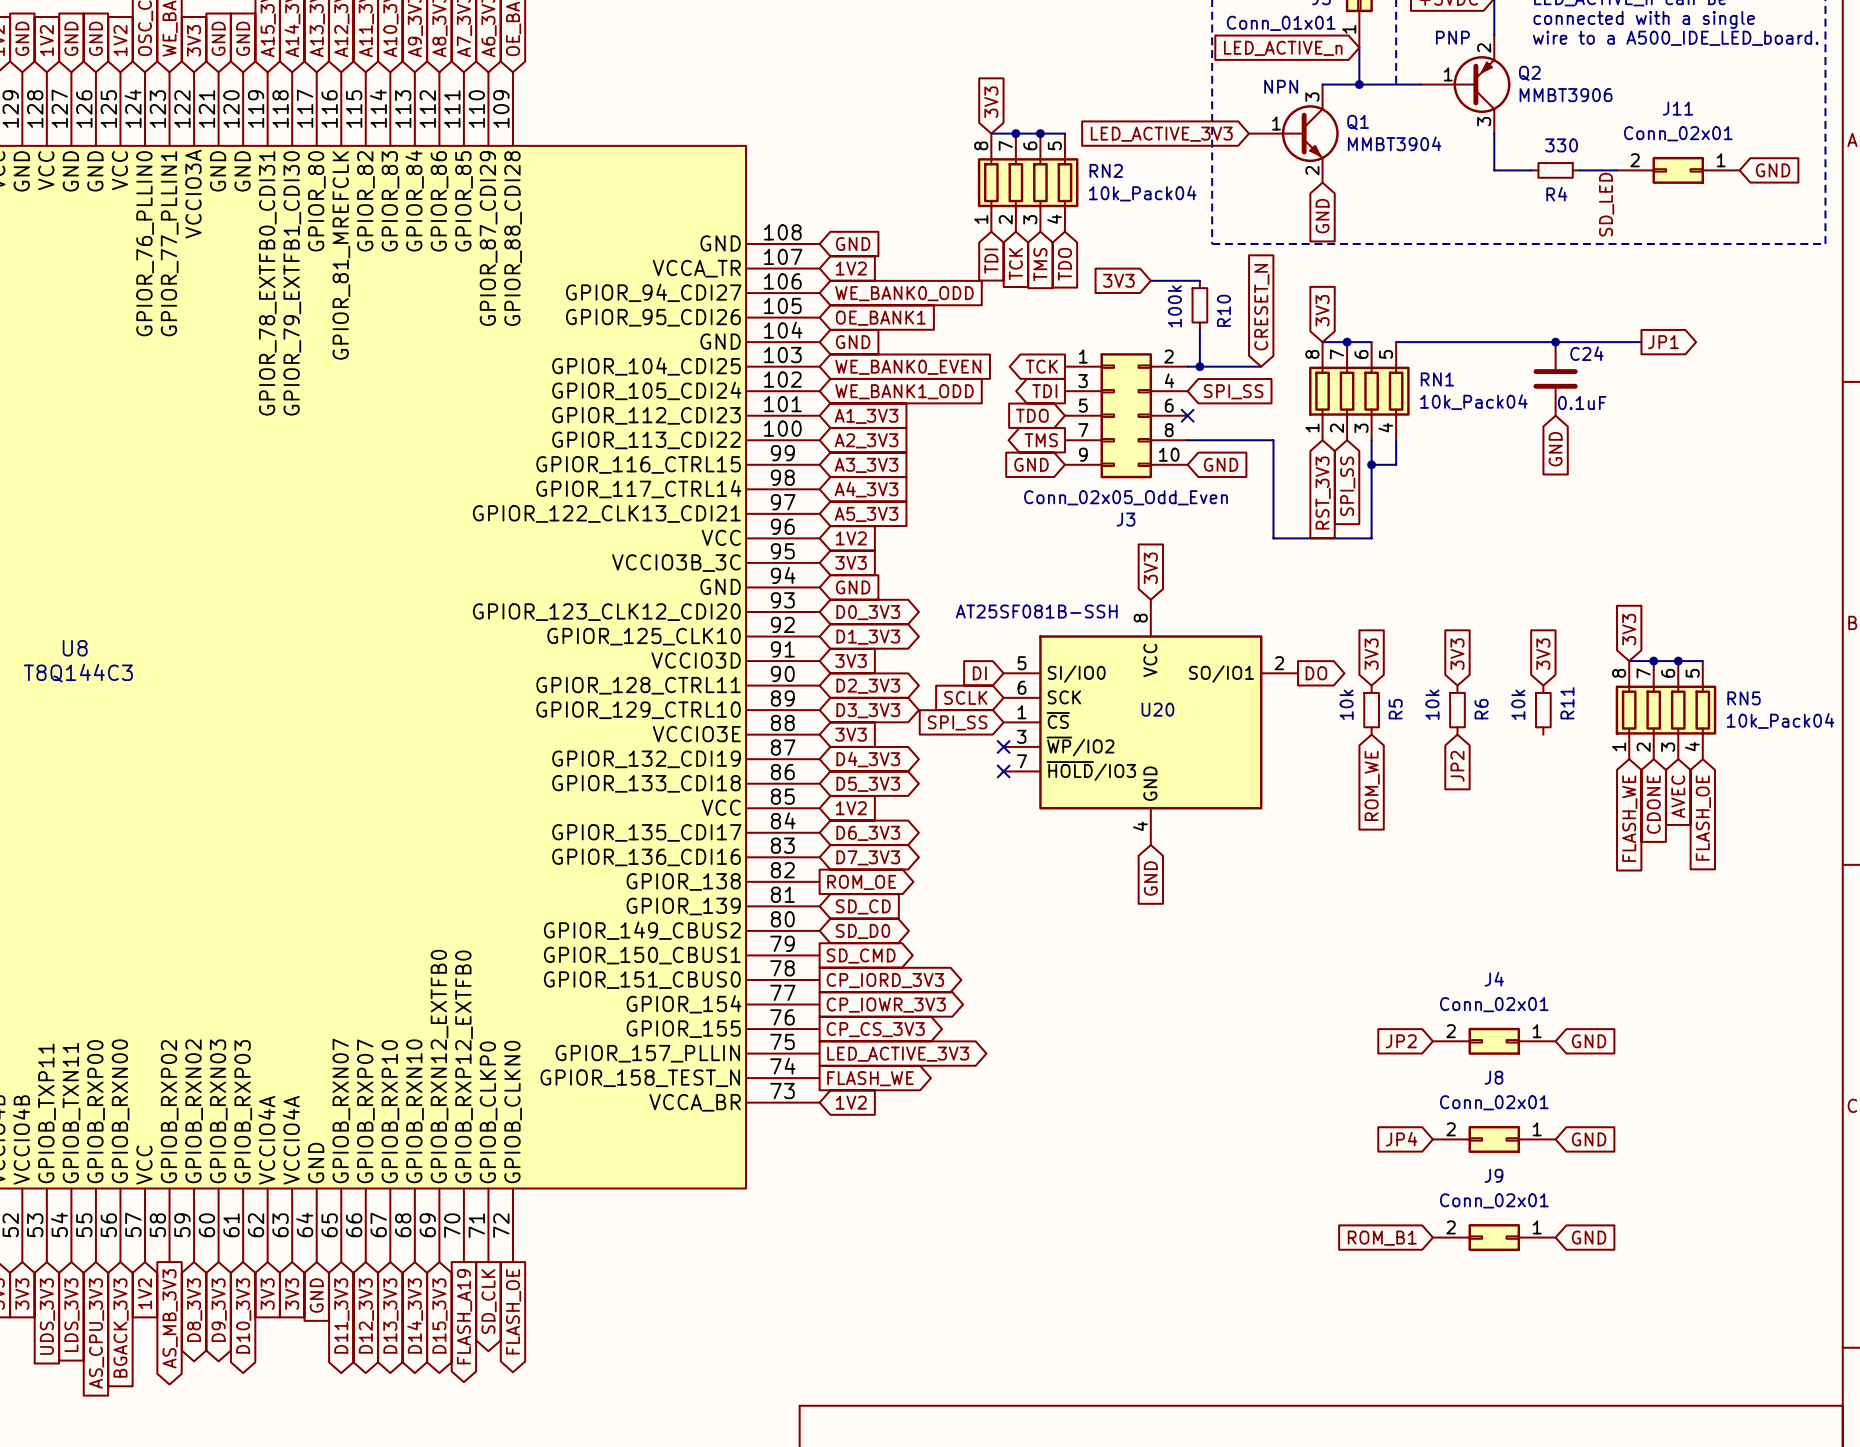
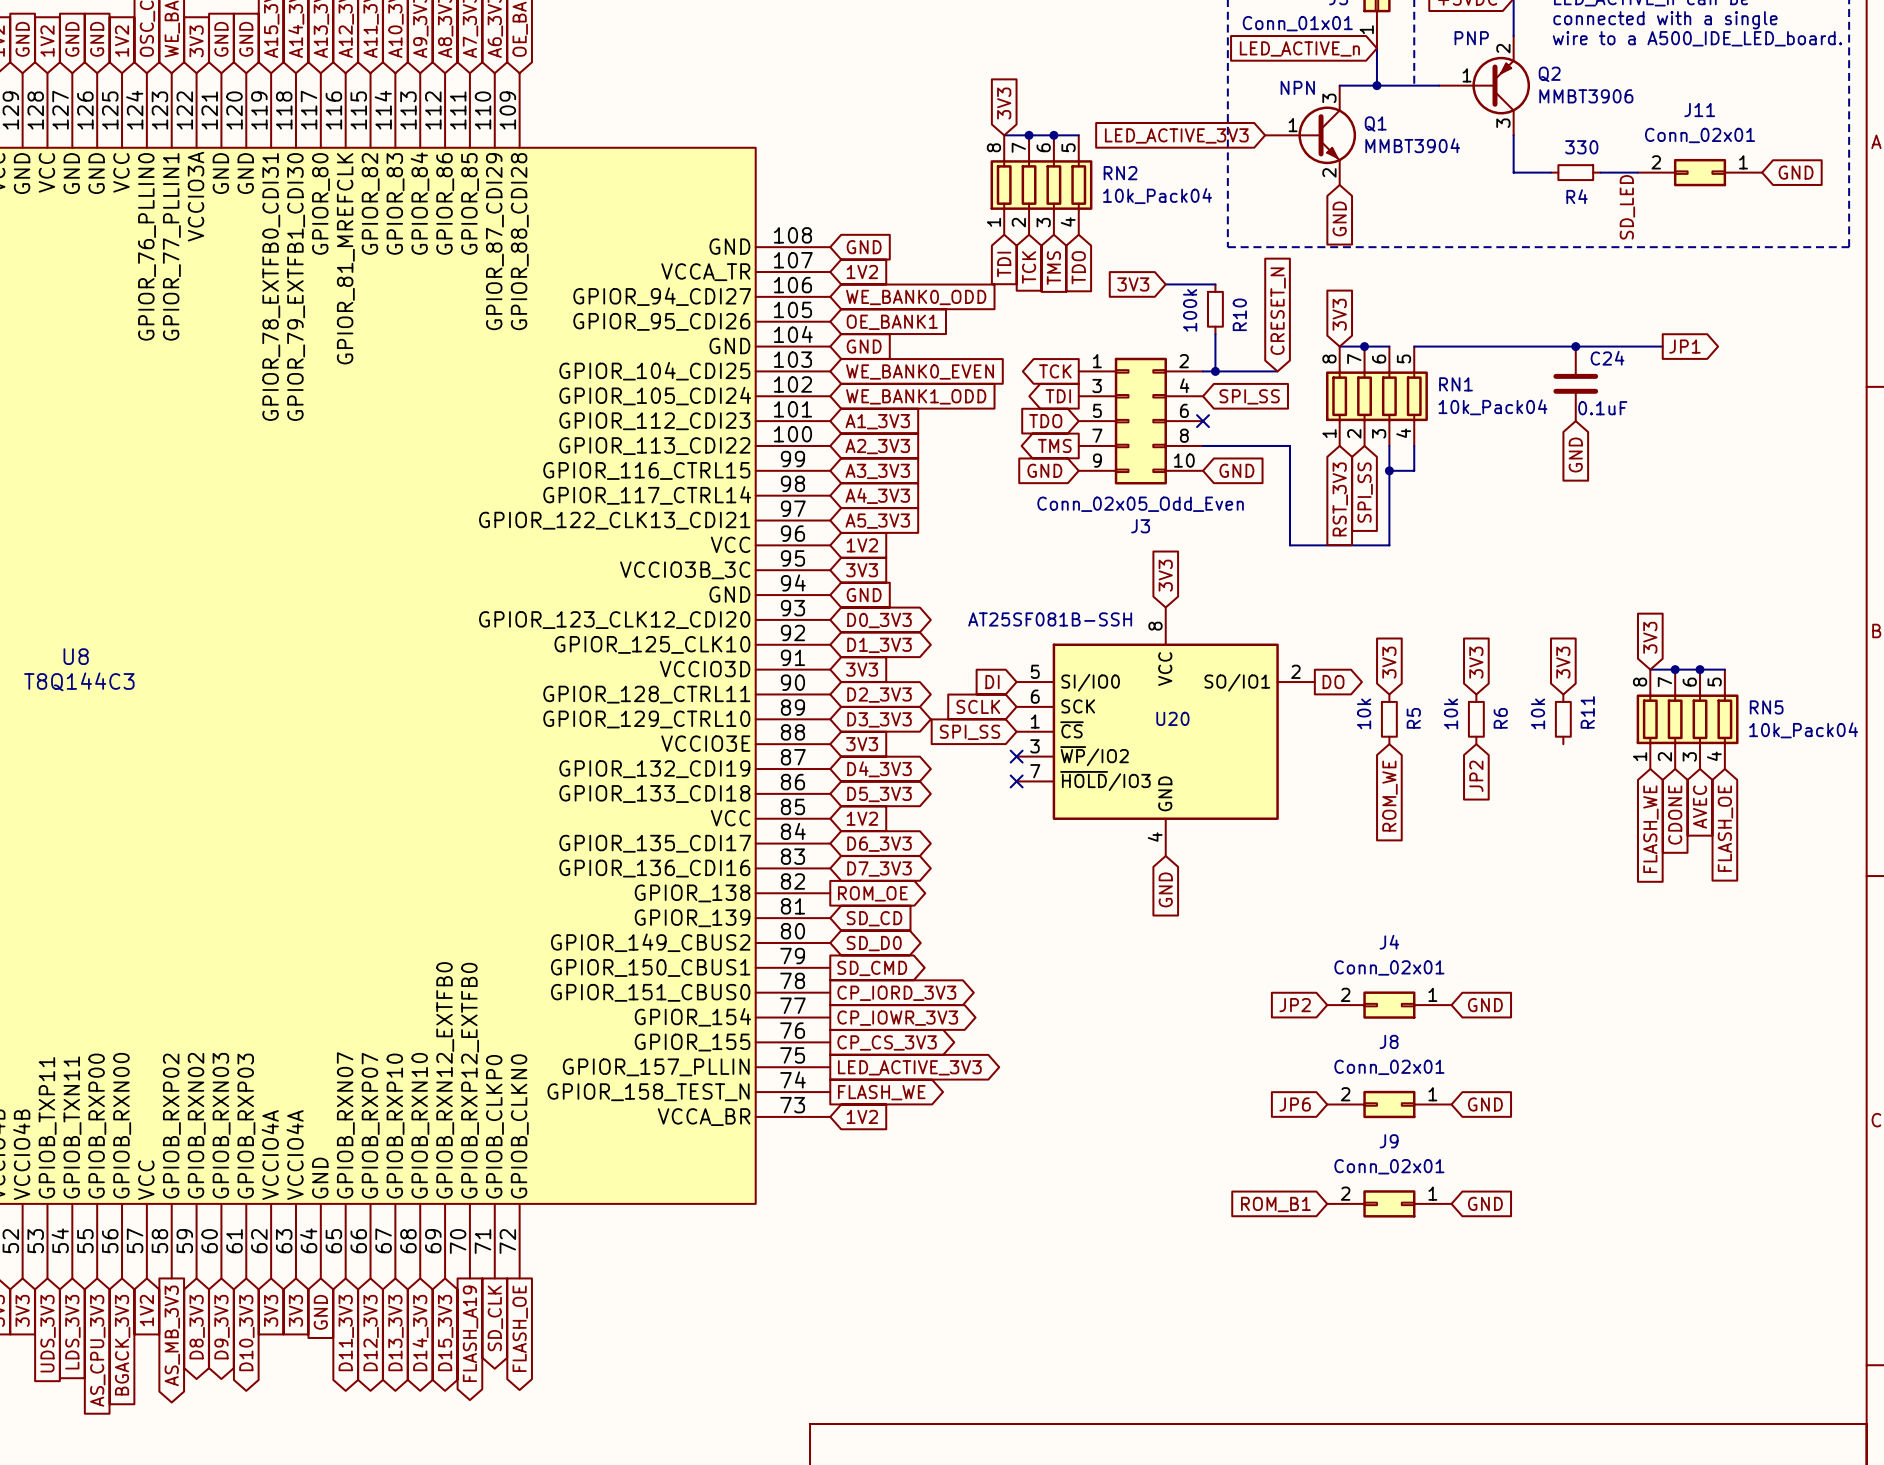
global label: none -> GND (1485, 1005)
global label position: JP2 (1401, 1041) -> JP2 (1295, 1005)
J4 position: (1494, 1041) -> (1389, 1005)
global label: GND (1589, 1041) -> none
global label: none -> JP6 (1295, 1104)
global label: none -> GND (1485, 1104)
global label: JP4 (1401, 1139) -> none
J8 position: (1494, 1139) -> (1389, 1104)
global label: GND (1589, 1139) -> none
global label: none -> GND (1485, 1203)
J9 position: (1494, 1237) -> (1389, 1203)
global label: GND (1589, 1237) -> none
global label position: ROM_B1 (1382, 1238) -> ROM_B1 (1275, 1204)

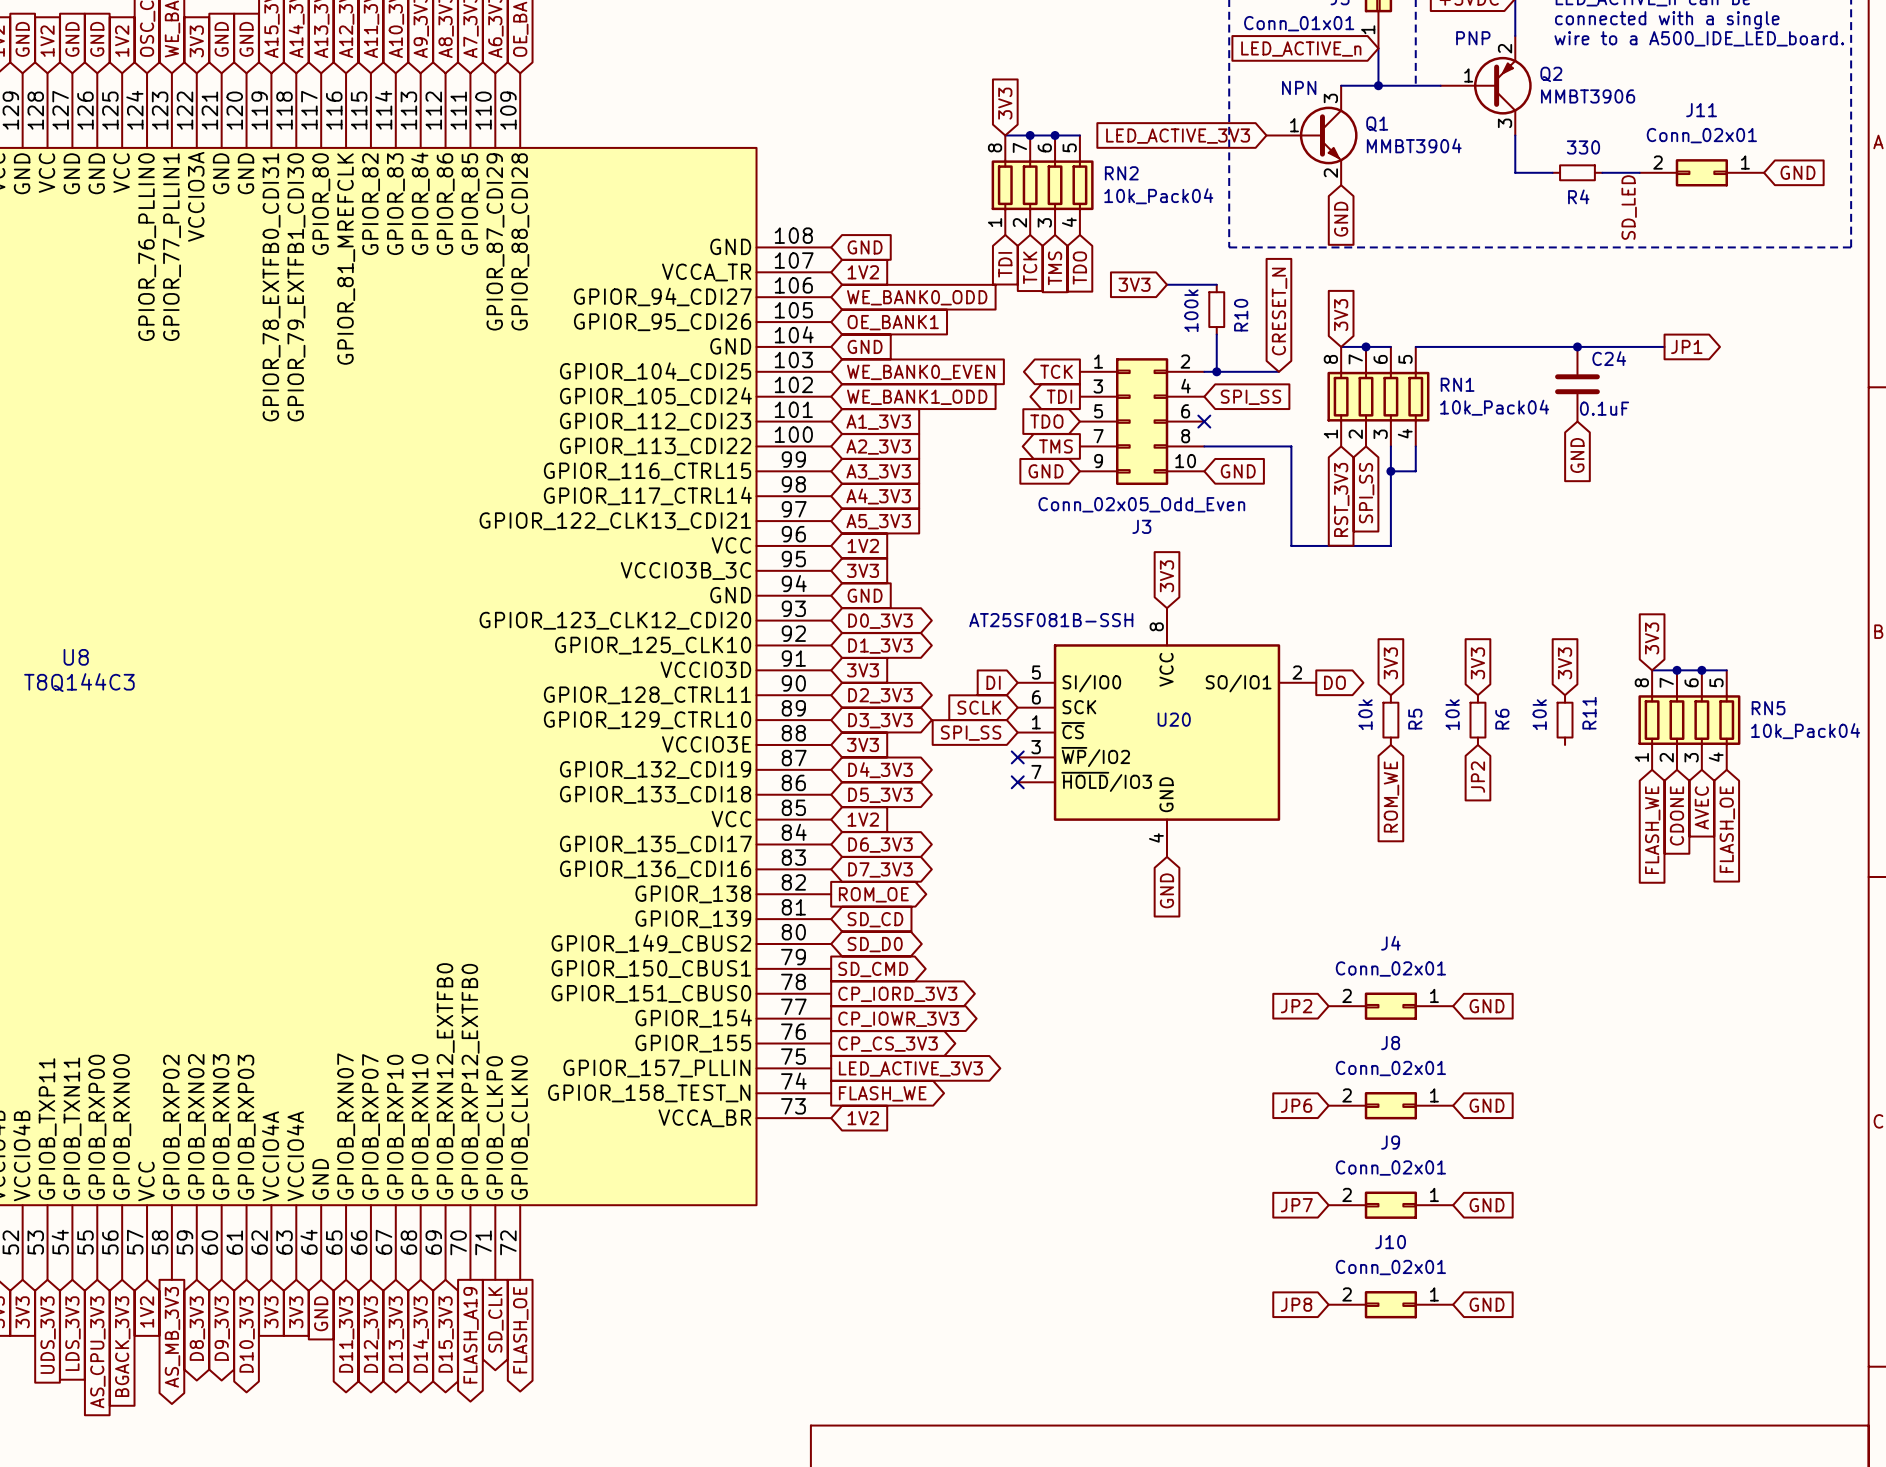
global label: ROM_B1 (1275, 1204) -> JP7 (1296, 1205)
global label: none -> JP8 (1296, 1304)
J10: none -> Conn_02x01 (1390, 1304)
global label: none -> GND (1487, 1304)

